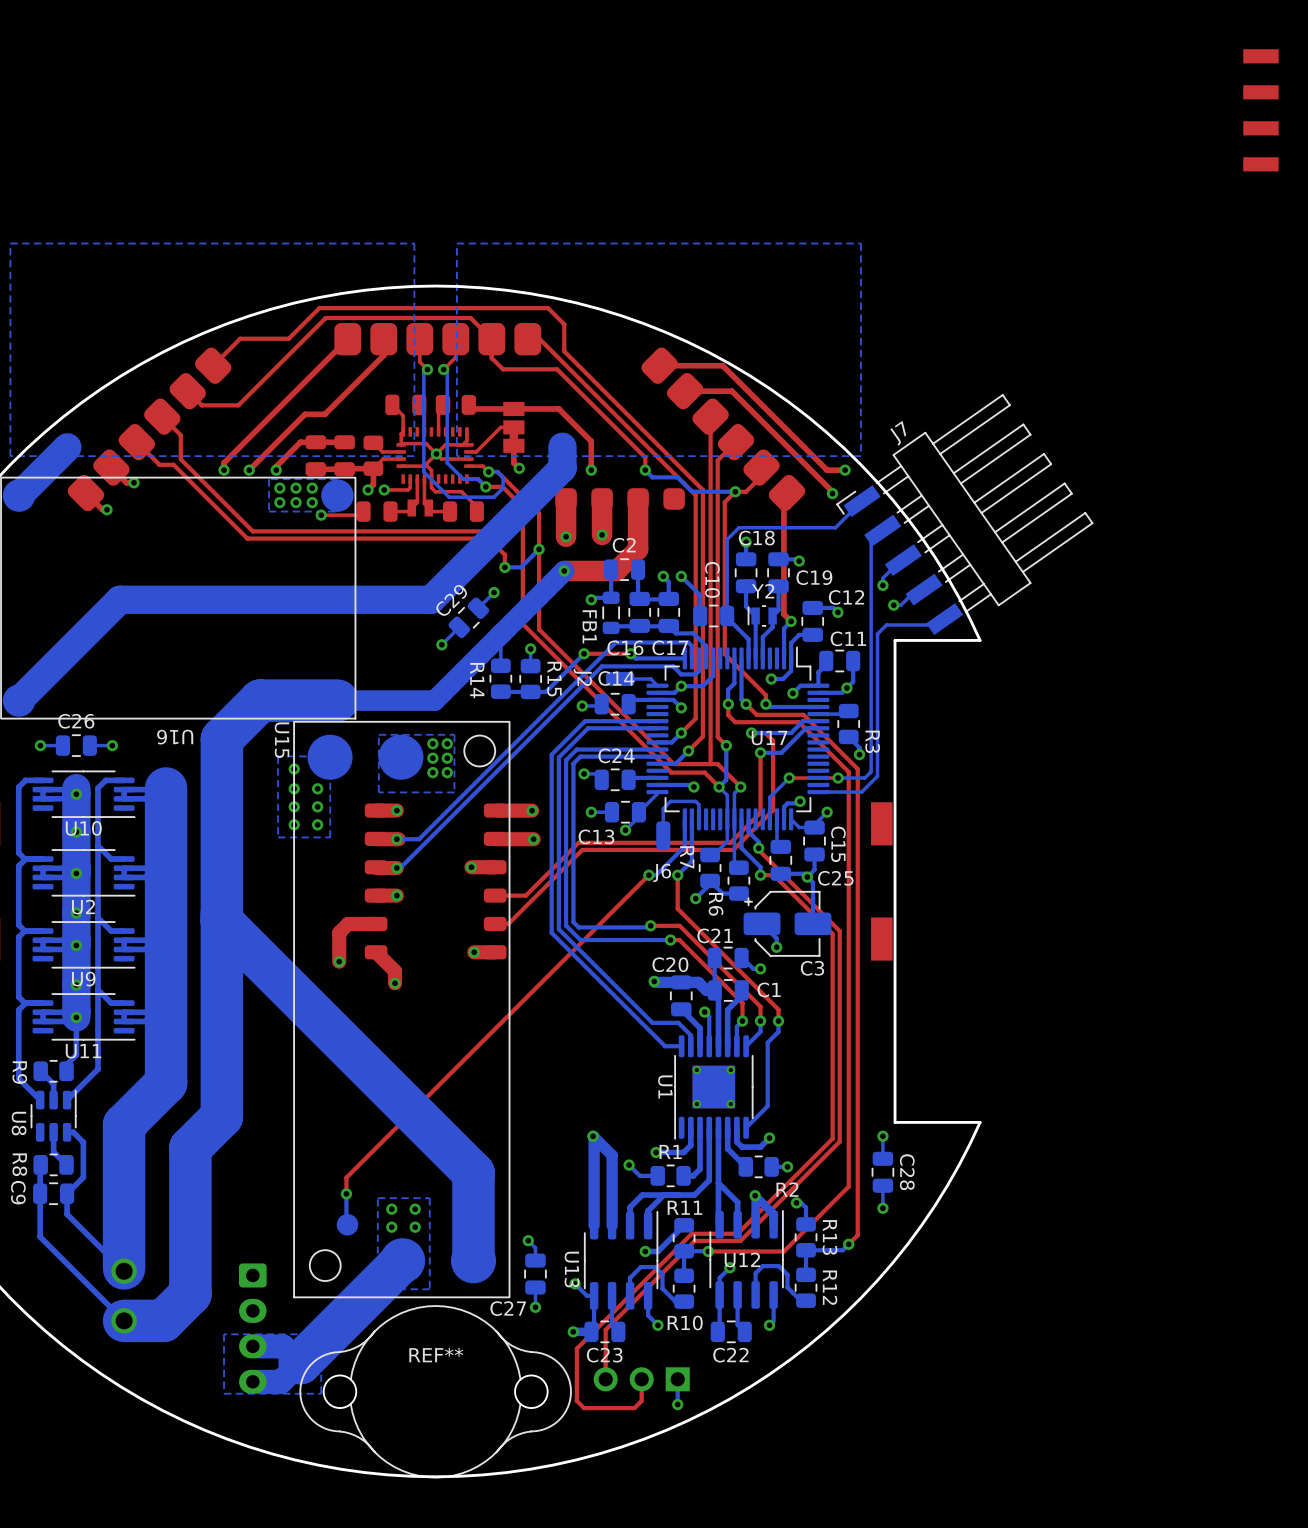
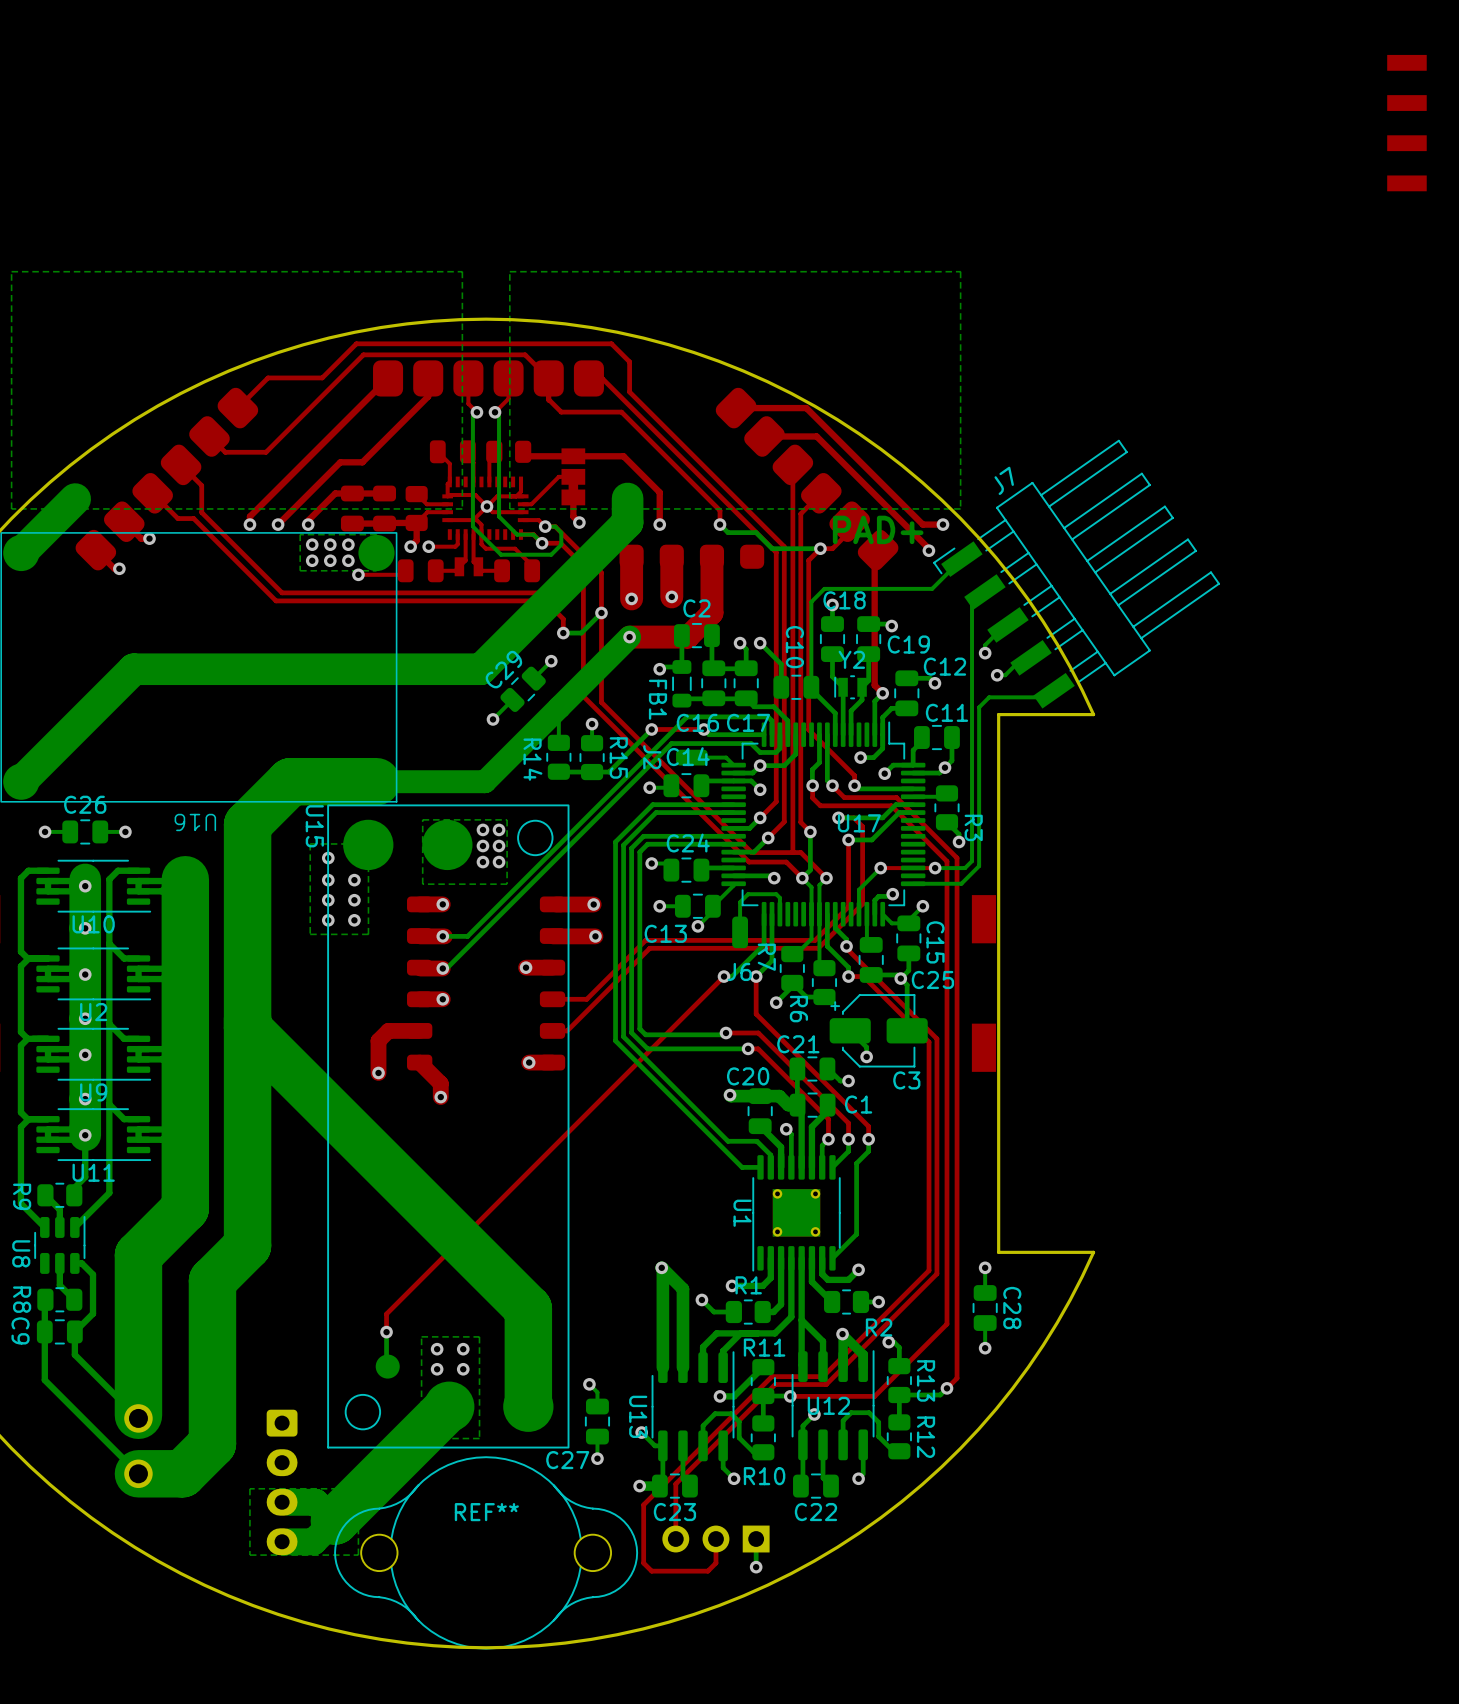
text: none -> PAD+ (878, 529)

